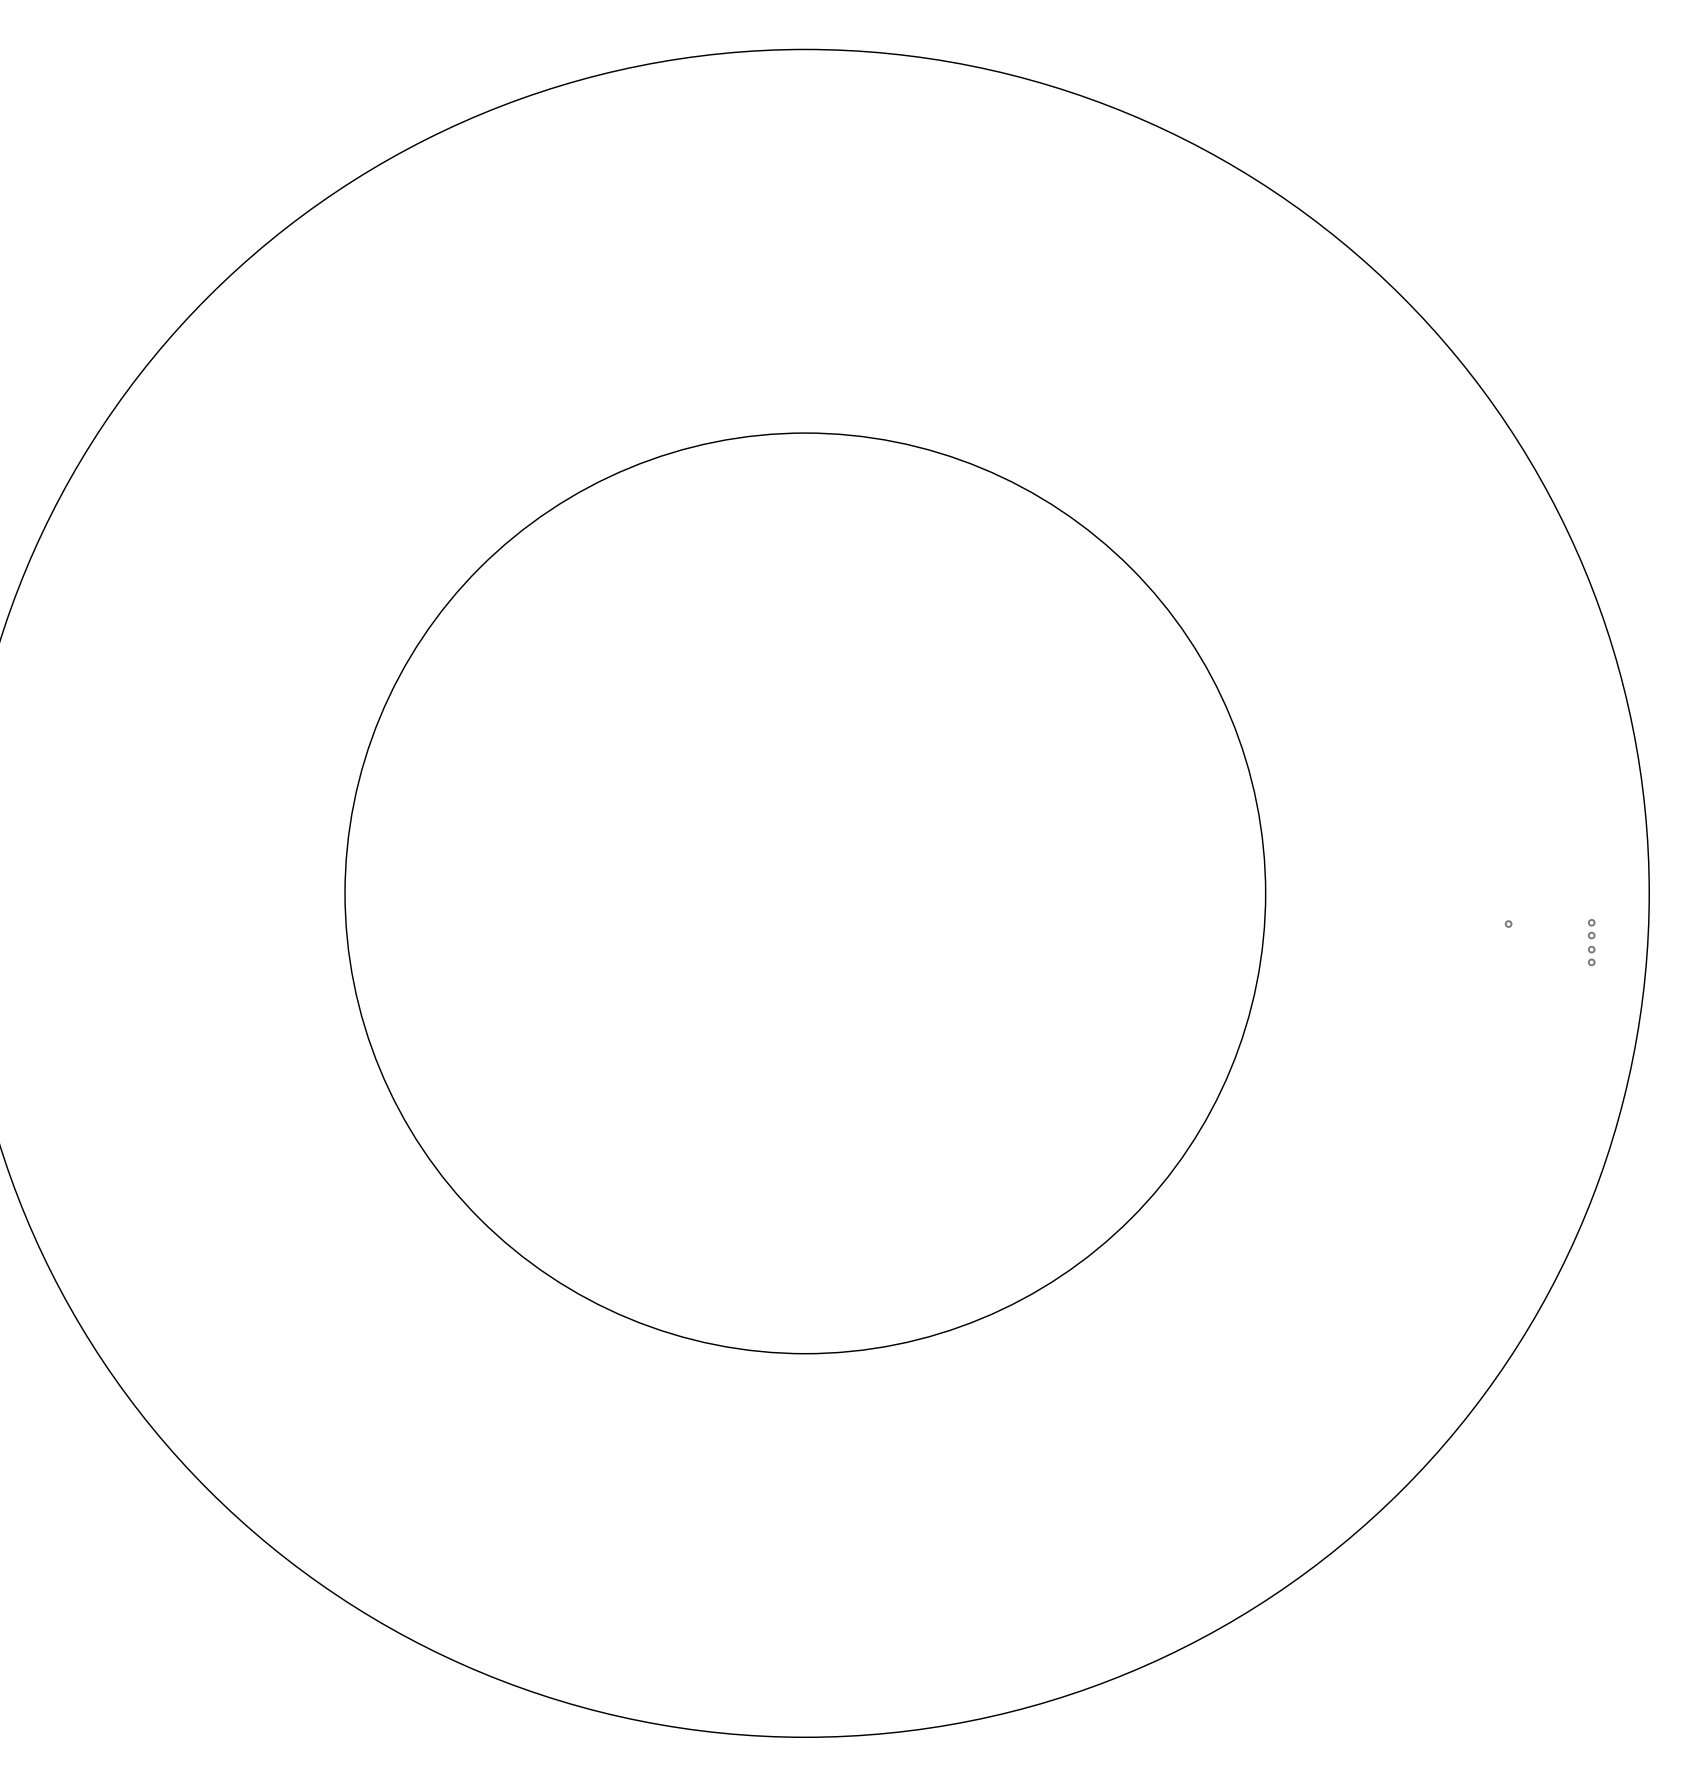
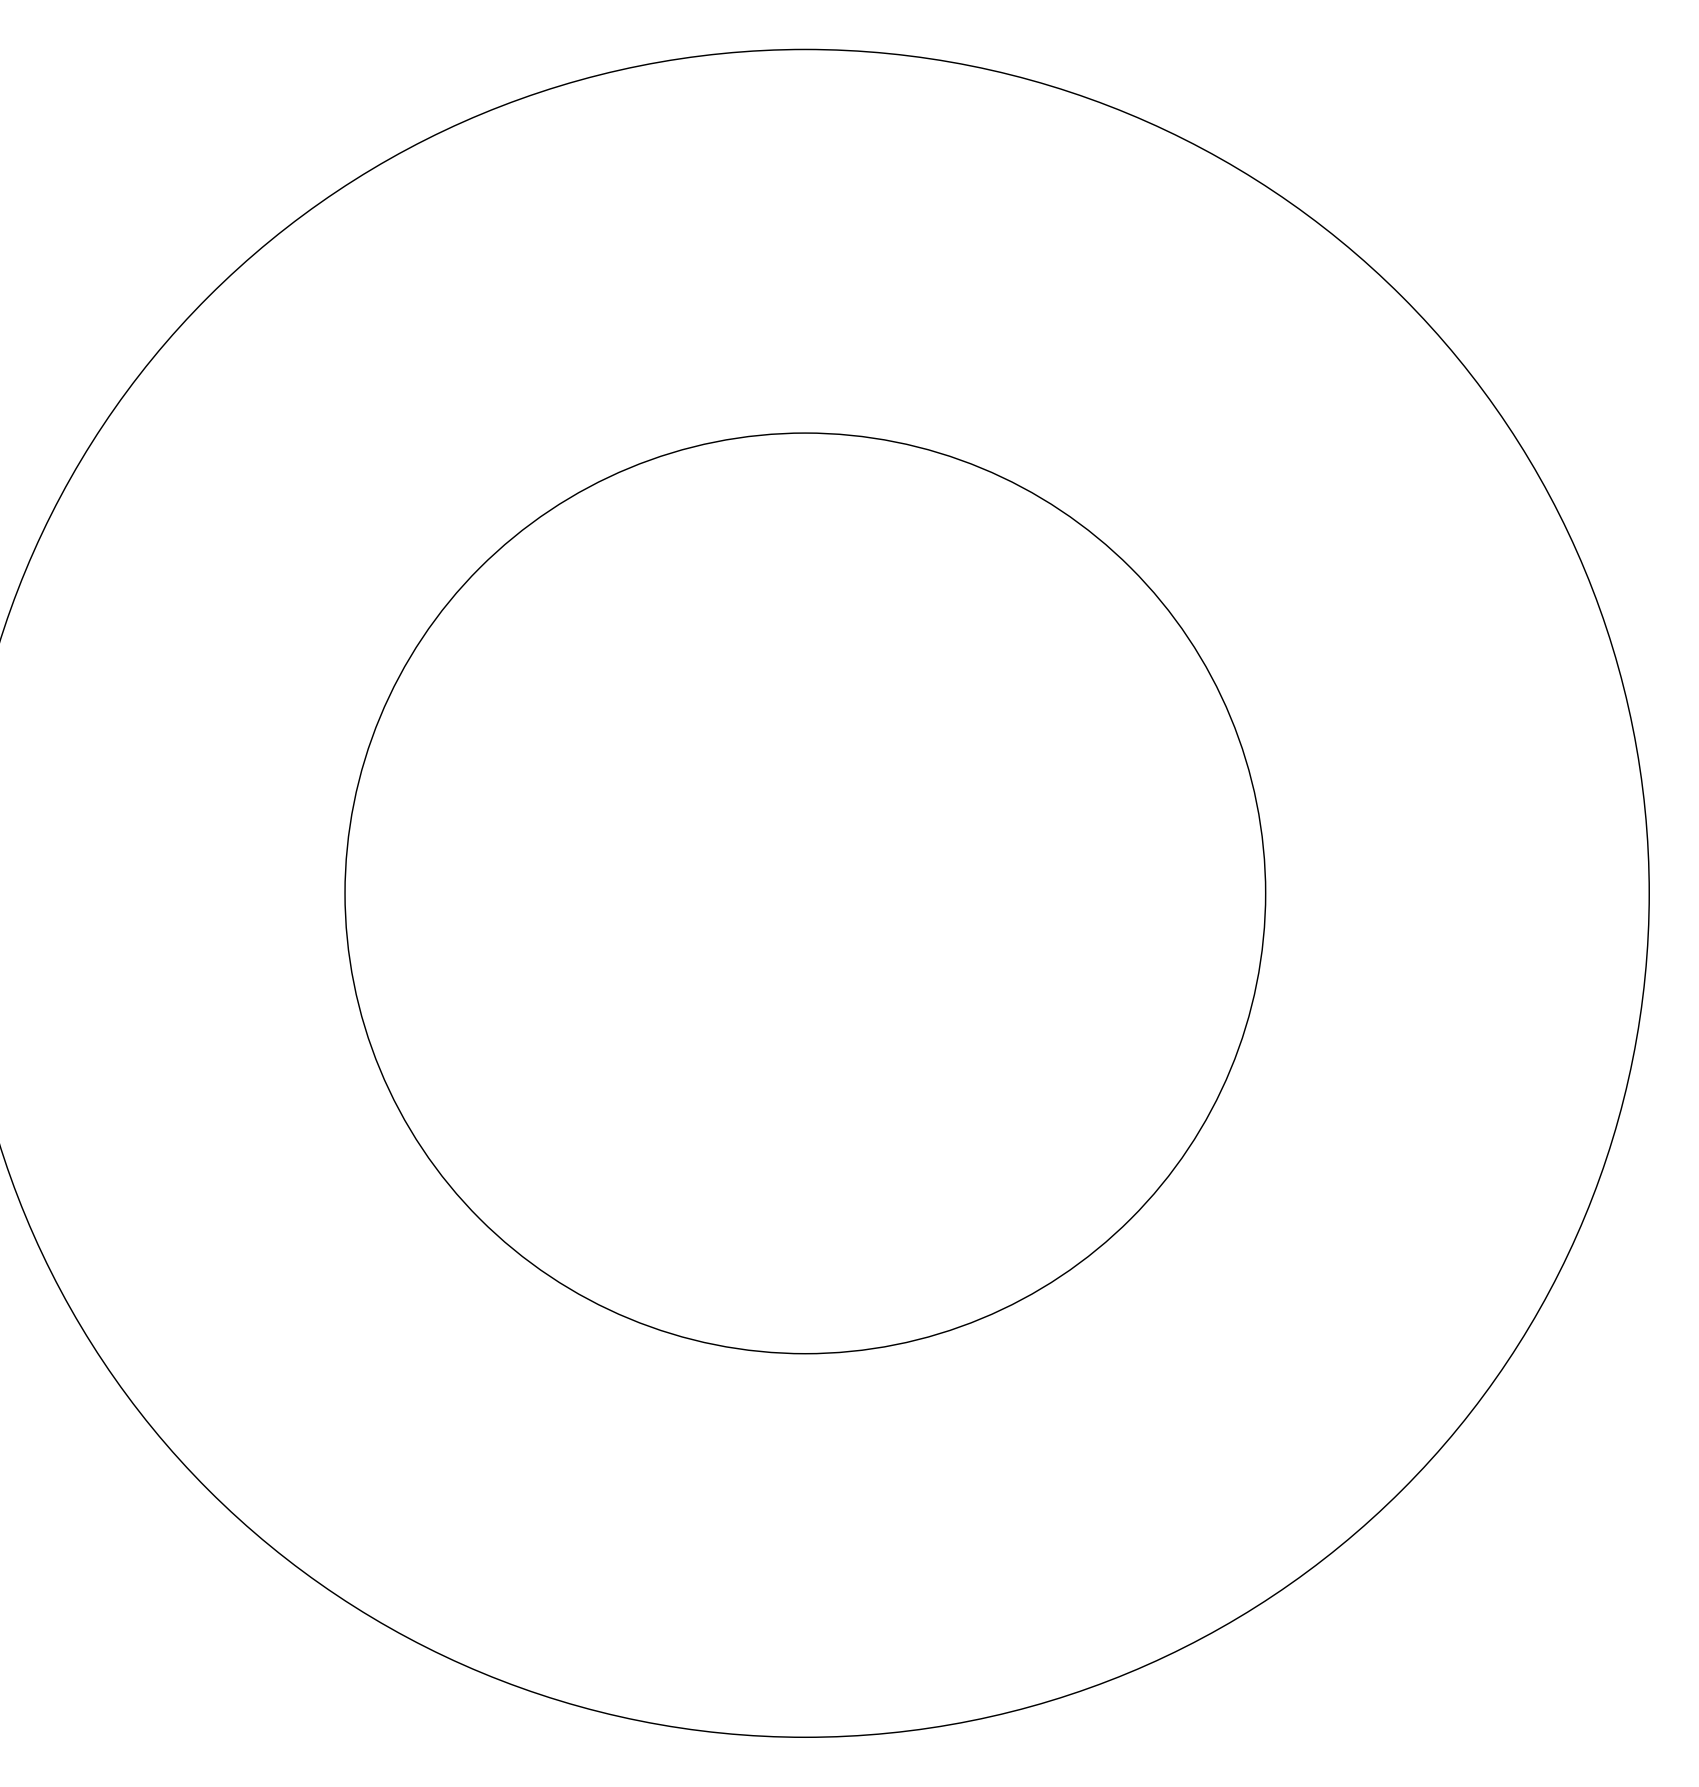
via: (1591, 922) -> none
via: (1508, 924) -> none
via: (1591, 935) -> none
via: (1591, 949) -> none
via: (1591, 962) -> none

